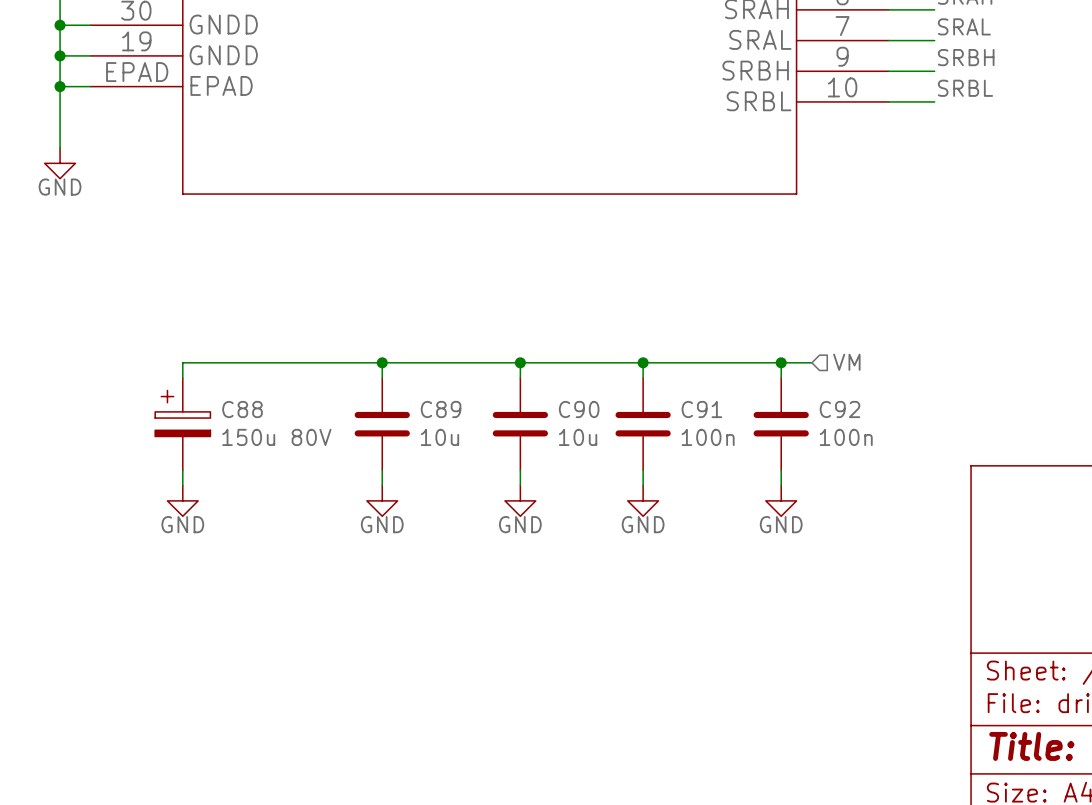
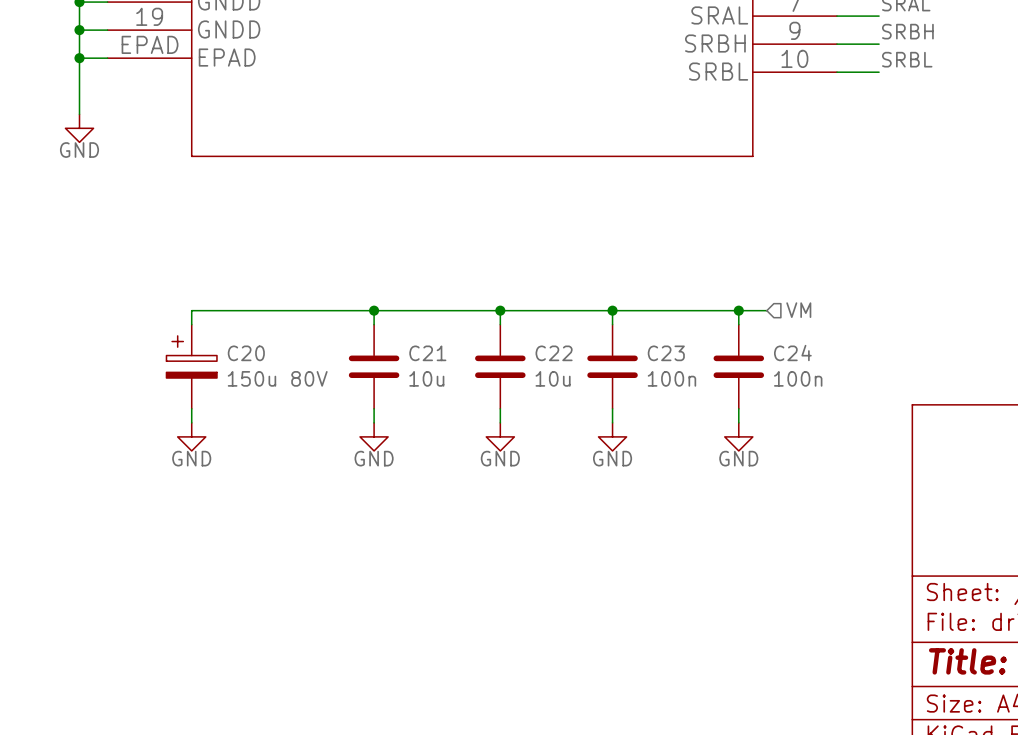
C88 name: C88 (242, 409) -> C20 (246, 353)
C89 name: C89 (441, 409) -> C21 (427, 353)
C90 name: C90 (579, 409) -> C22 (554, 353)
C91 name: C91 (701, 409) -> C23 (666, 353)
C92 name: C92 (840, 409) -> C24 (792, 353)

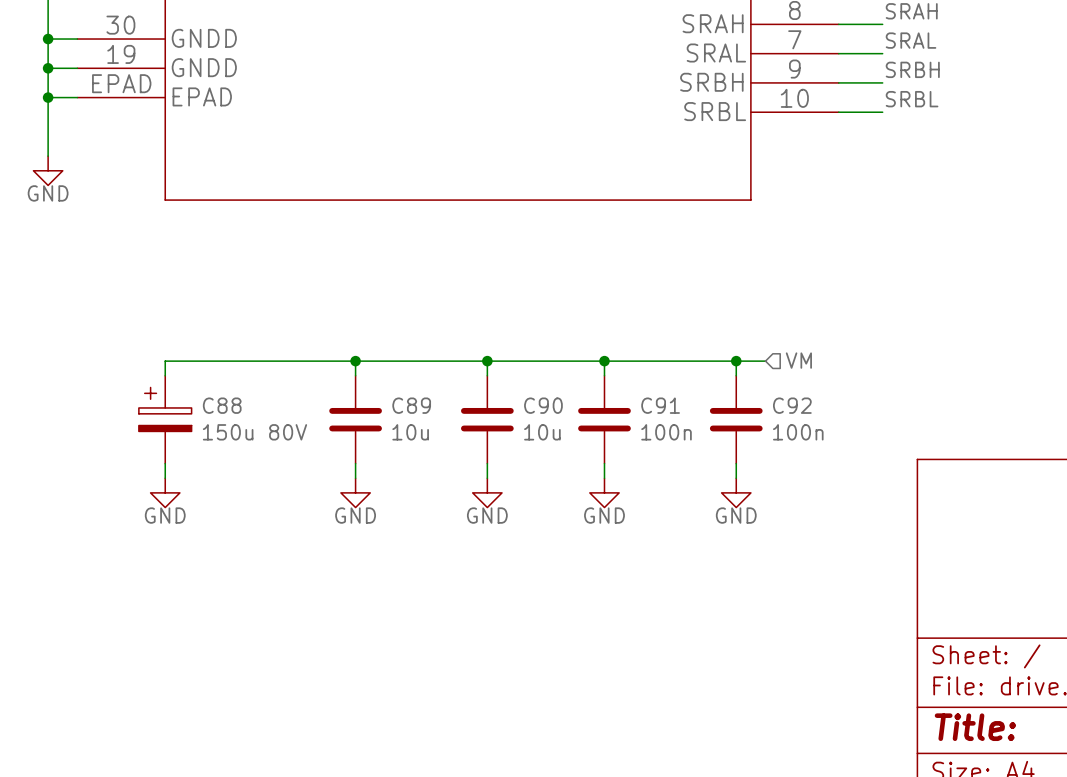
C20 name: C20 (246, 353) -> C88 (222, 405)
C21 name: C21 (427, 353) -> C89 (411, 405)
C22 name: C22 (554, 353) -> C90 (543, 405)
C23 name: C23 (666, 353) -> C91 (660, 405)
C24 name: C24 (792, 353) -> C92 (792, 405)

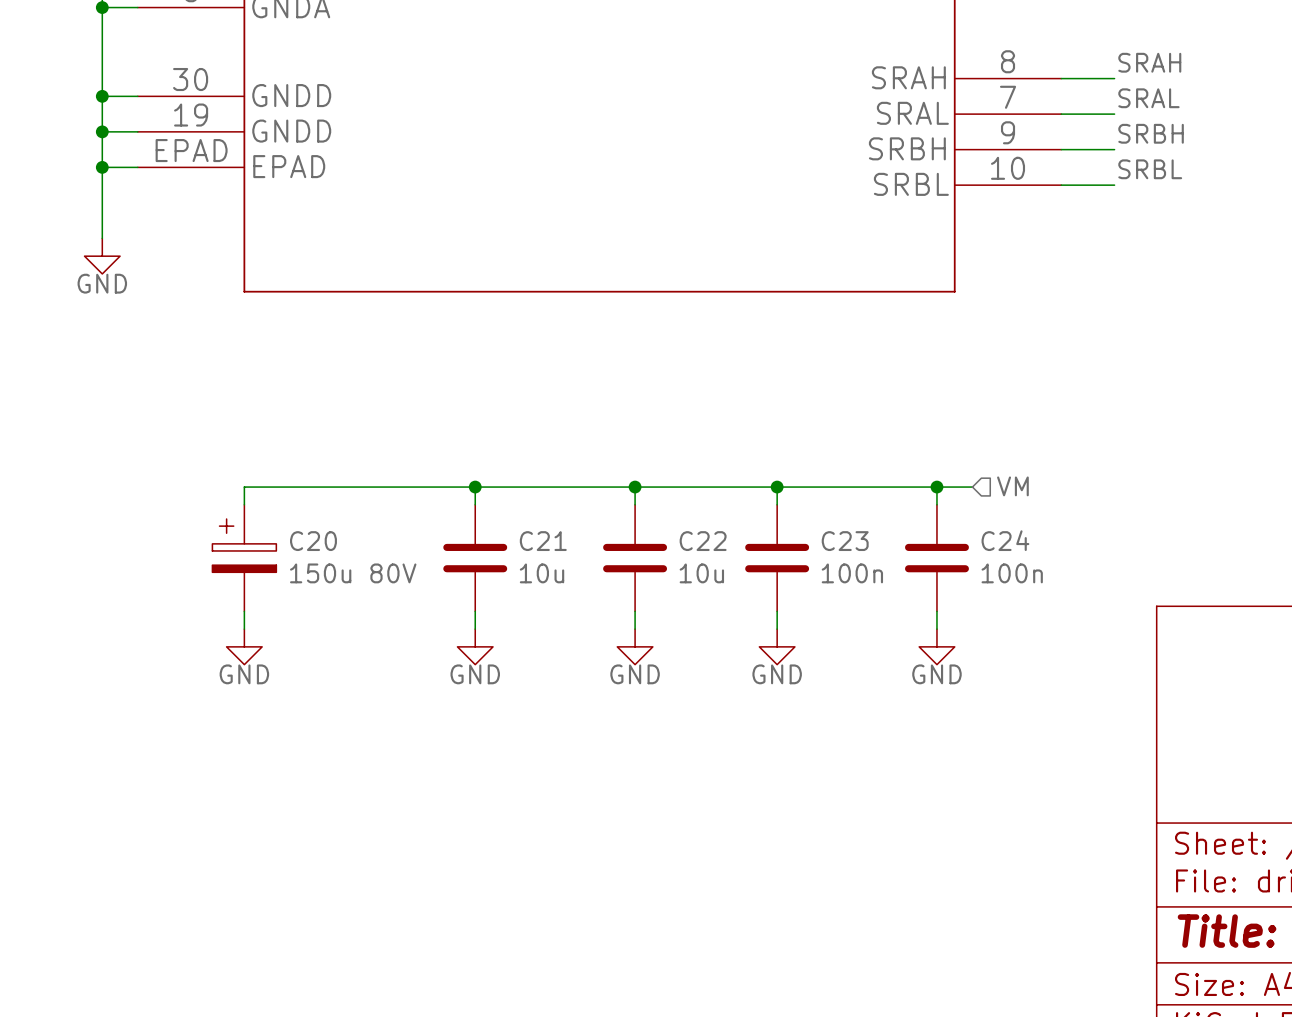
C88 name: C88 (222, 405) -> C20 (313, 541)
C89 name: C89 (411, 405) -> C21 (543, 541)
C90 name: C90 (543, 405) -> C22 (703, 541)
C91 name: C91 (660, 405) -> C23 (845, 541)
C92 name: C92 (792, 405) -> C24 (1005, 540)

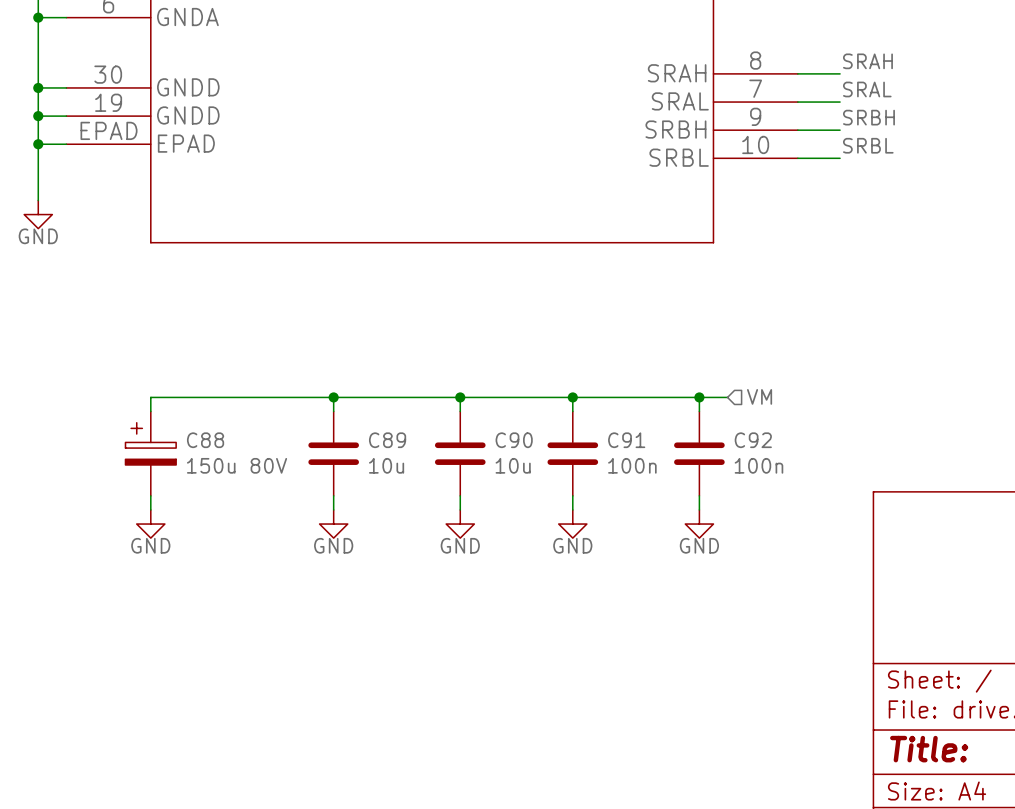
C24 name: C24 (1005, 540) -> C92 (753, 440)
C20 name: C20 (313, 541) -> C88 (205, 440)
C21 name: C21 (543, 541) -> C89 (387, 440)
C22 name: C22 (703, 541) -> C90 (514, 440)
C23 name: C23 (845, 541) -> C91 (626, 440)

